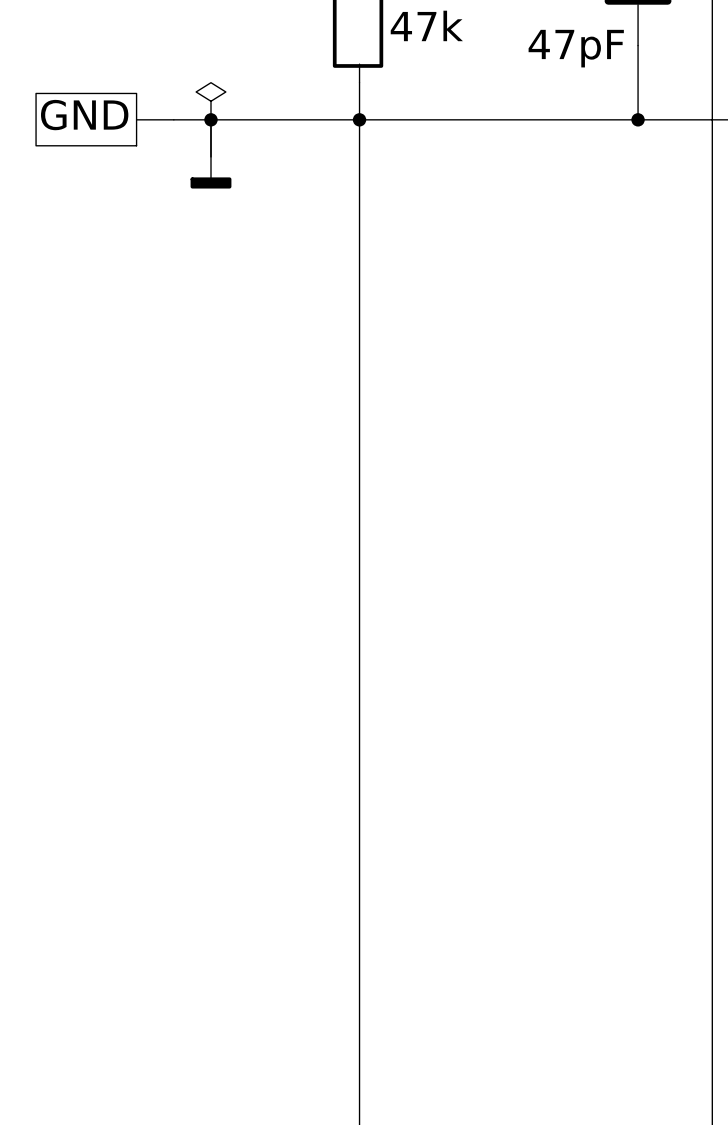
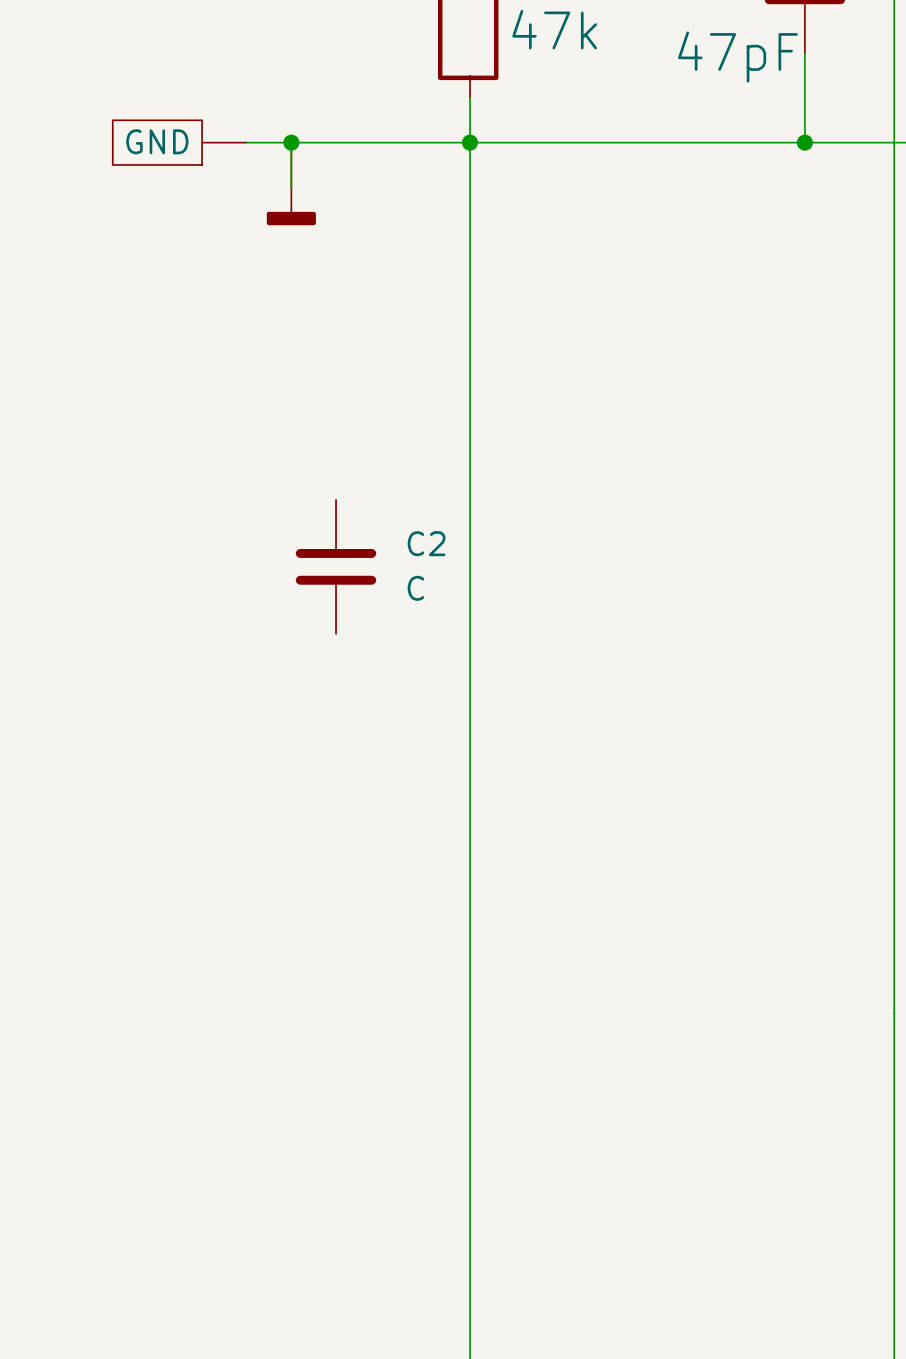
part symbol: [36, 93, 174, 146] -> [112, 120, 247, 165]
power symbol: (210, 101) -> none
C2: none -> C (336, 566)

